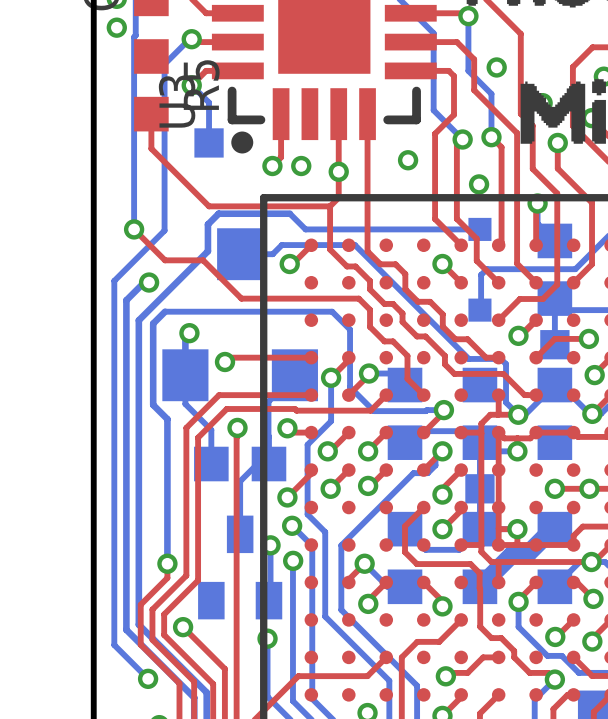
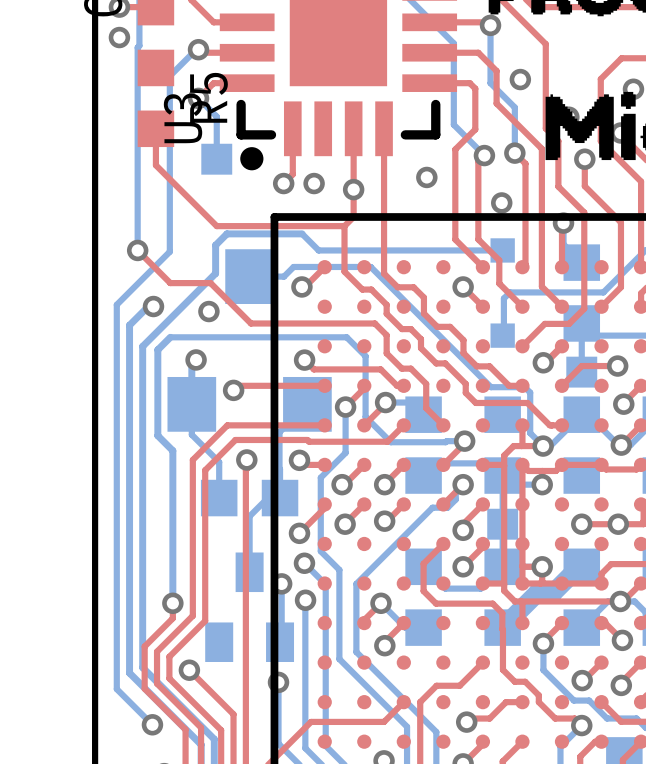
via: none -> (208, 311)
top track: none -> (304, 360) (313, 369) (380, 369) (397, 385) (403, 385)
via: none -> (304, 360)
top track: (423, 582) (442, 601) (442, 606) -> none
via: (442, 606) -> none

